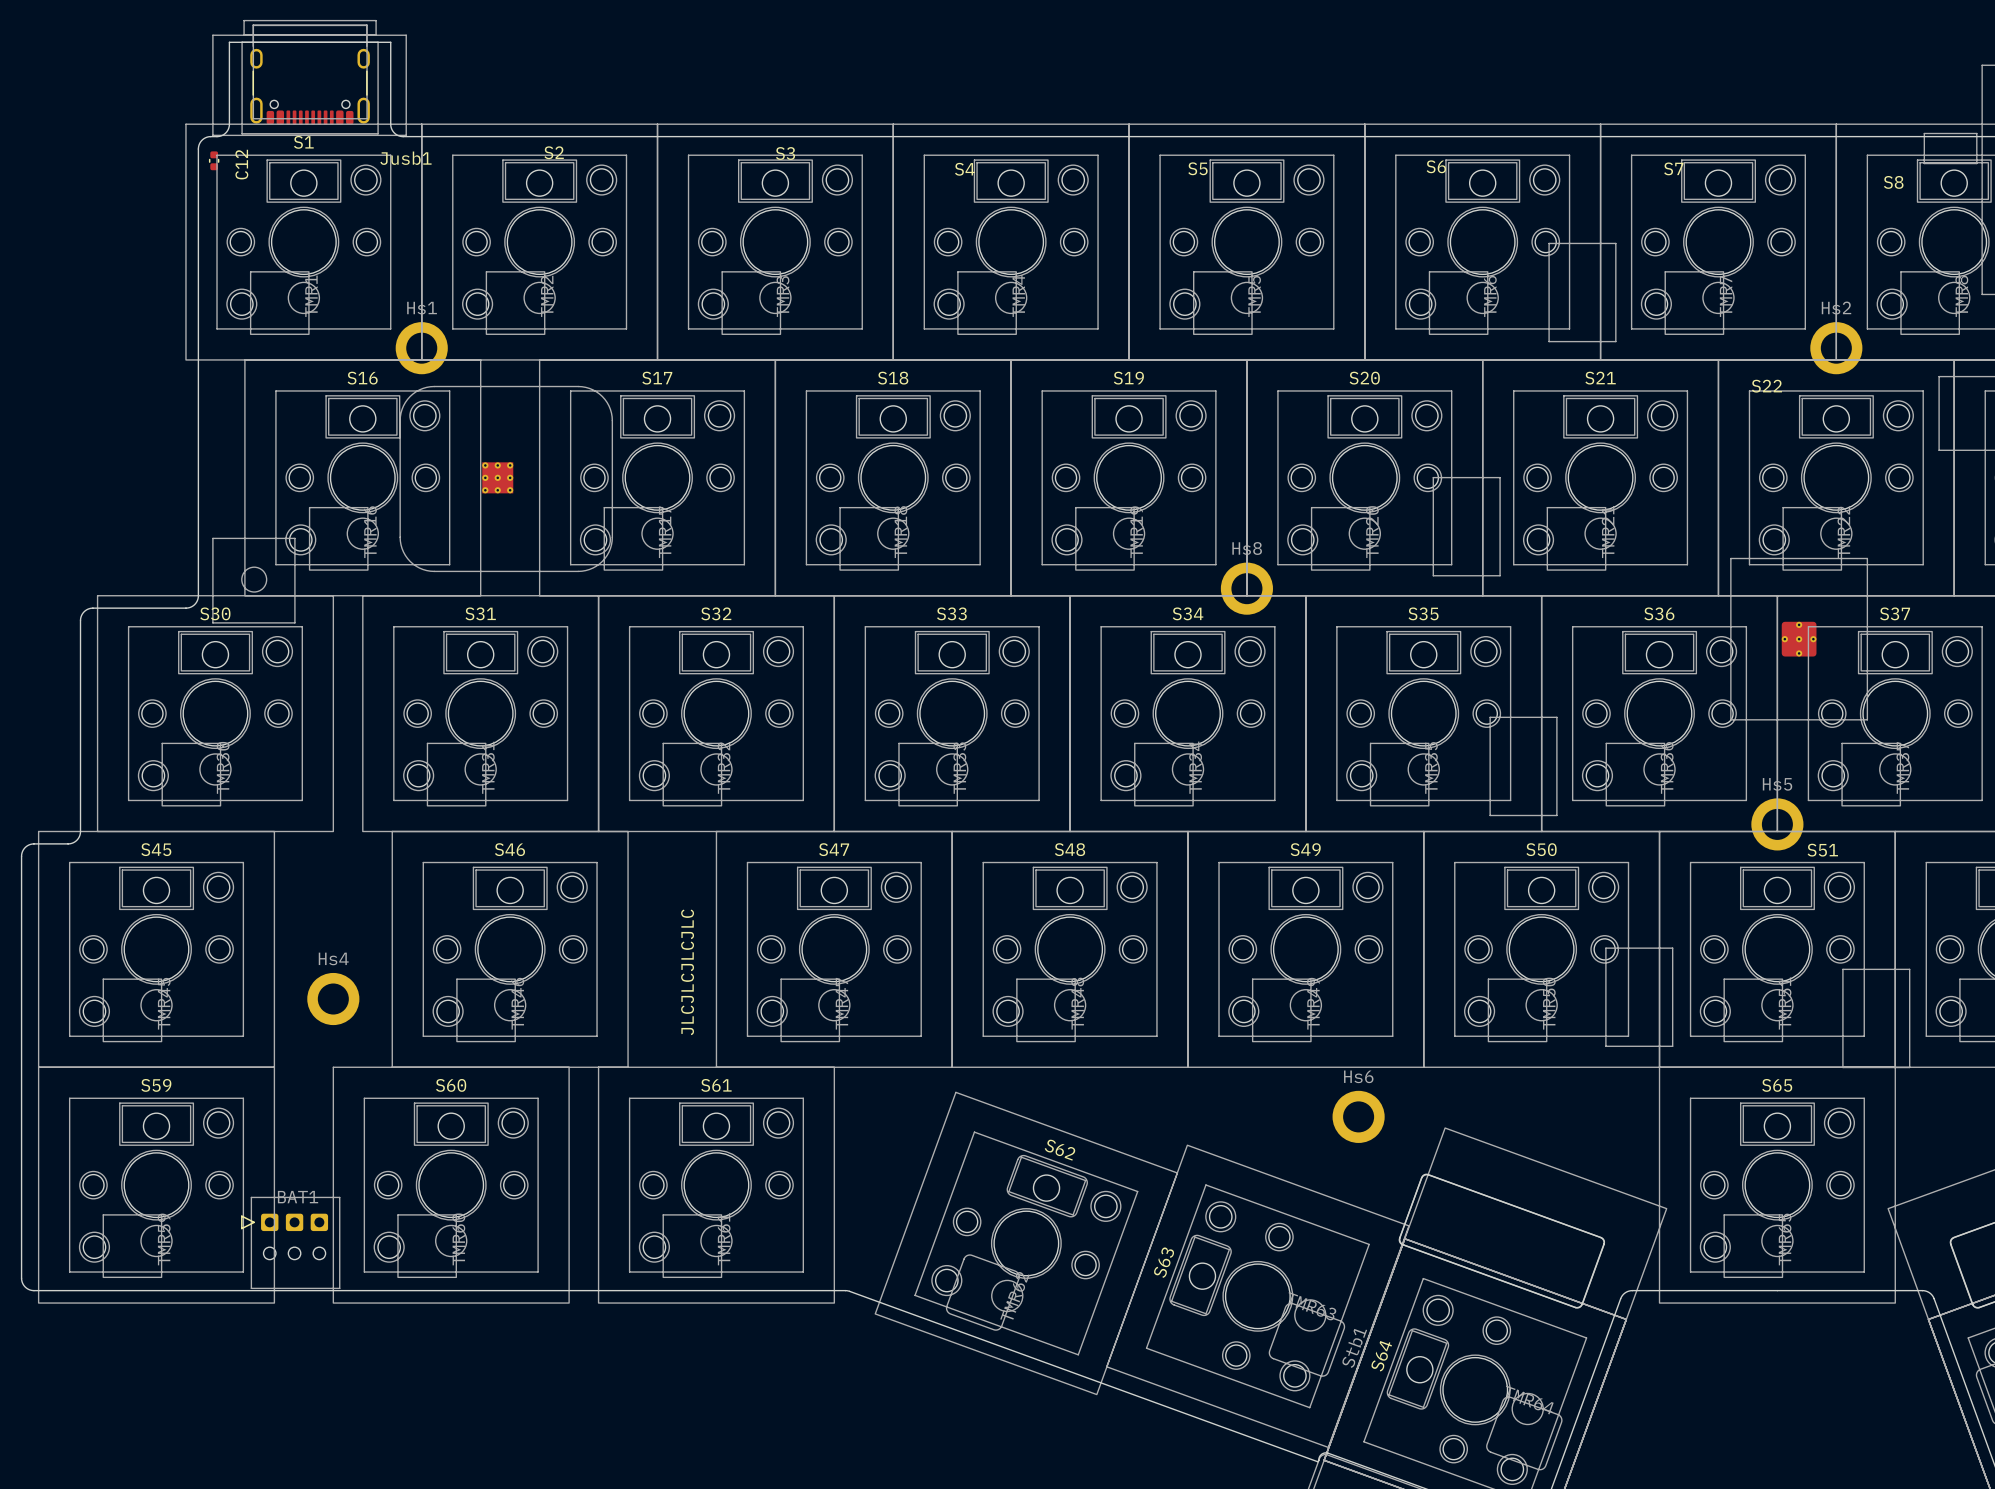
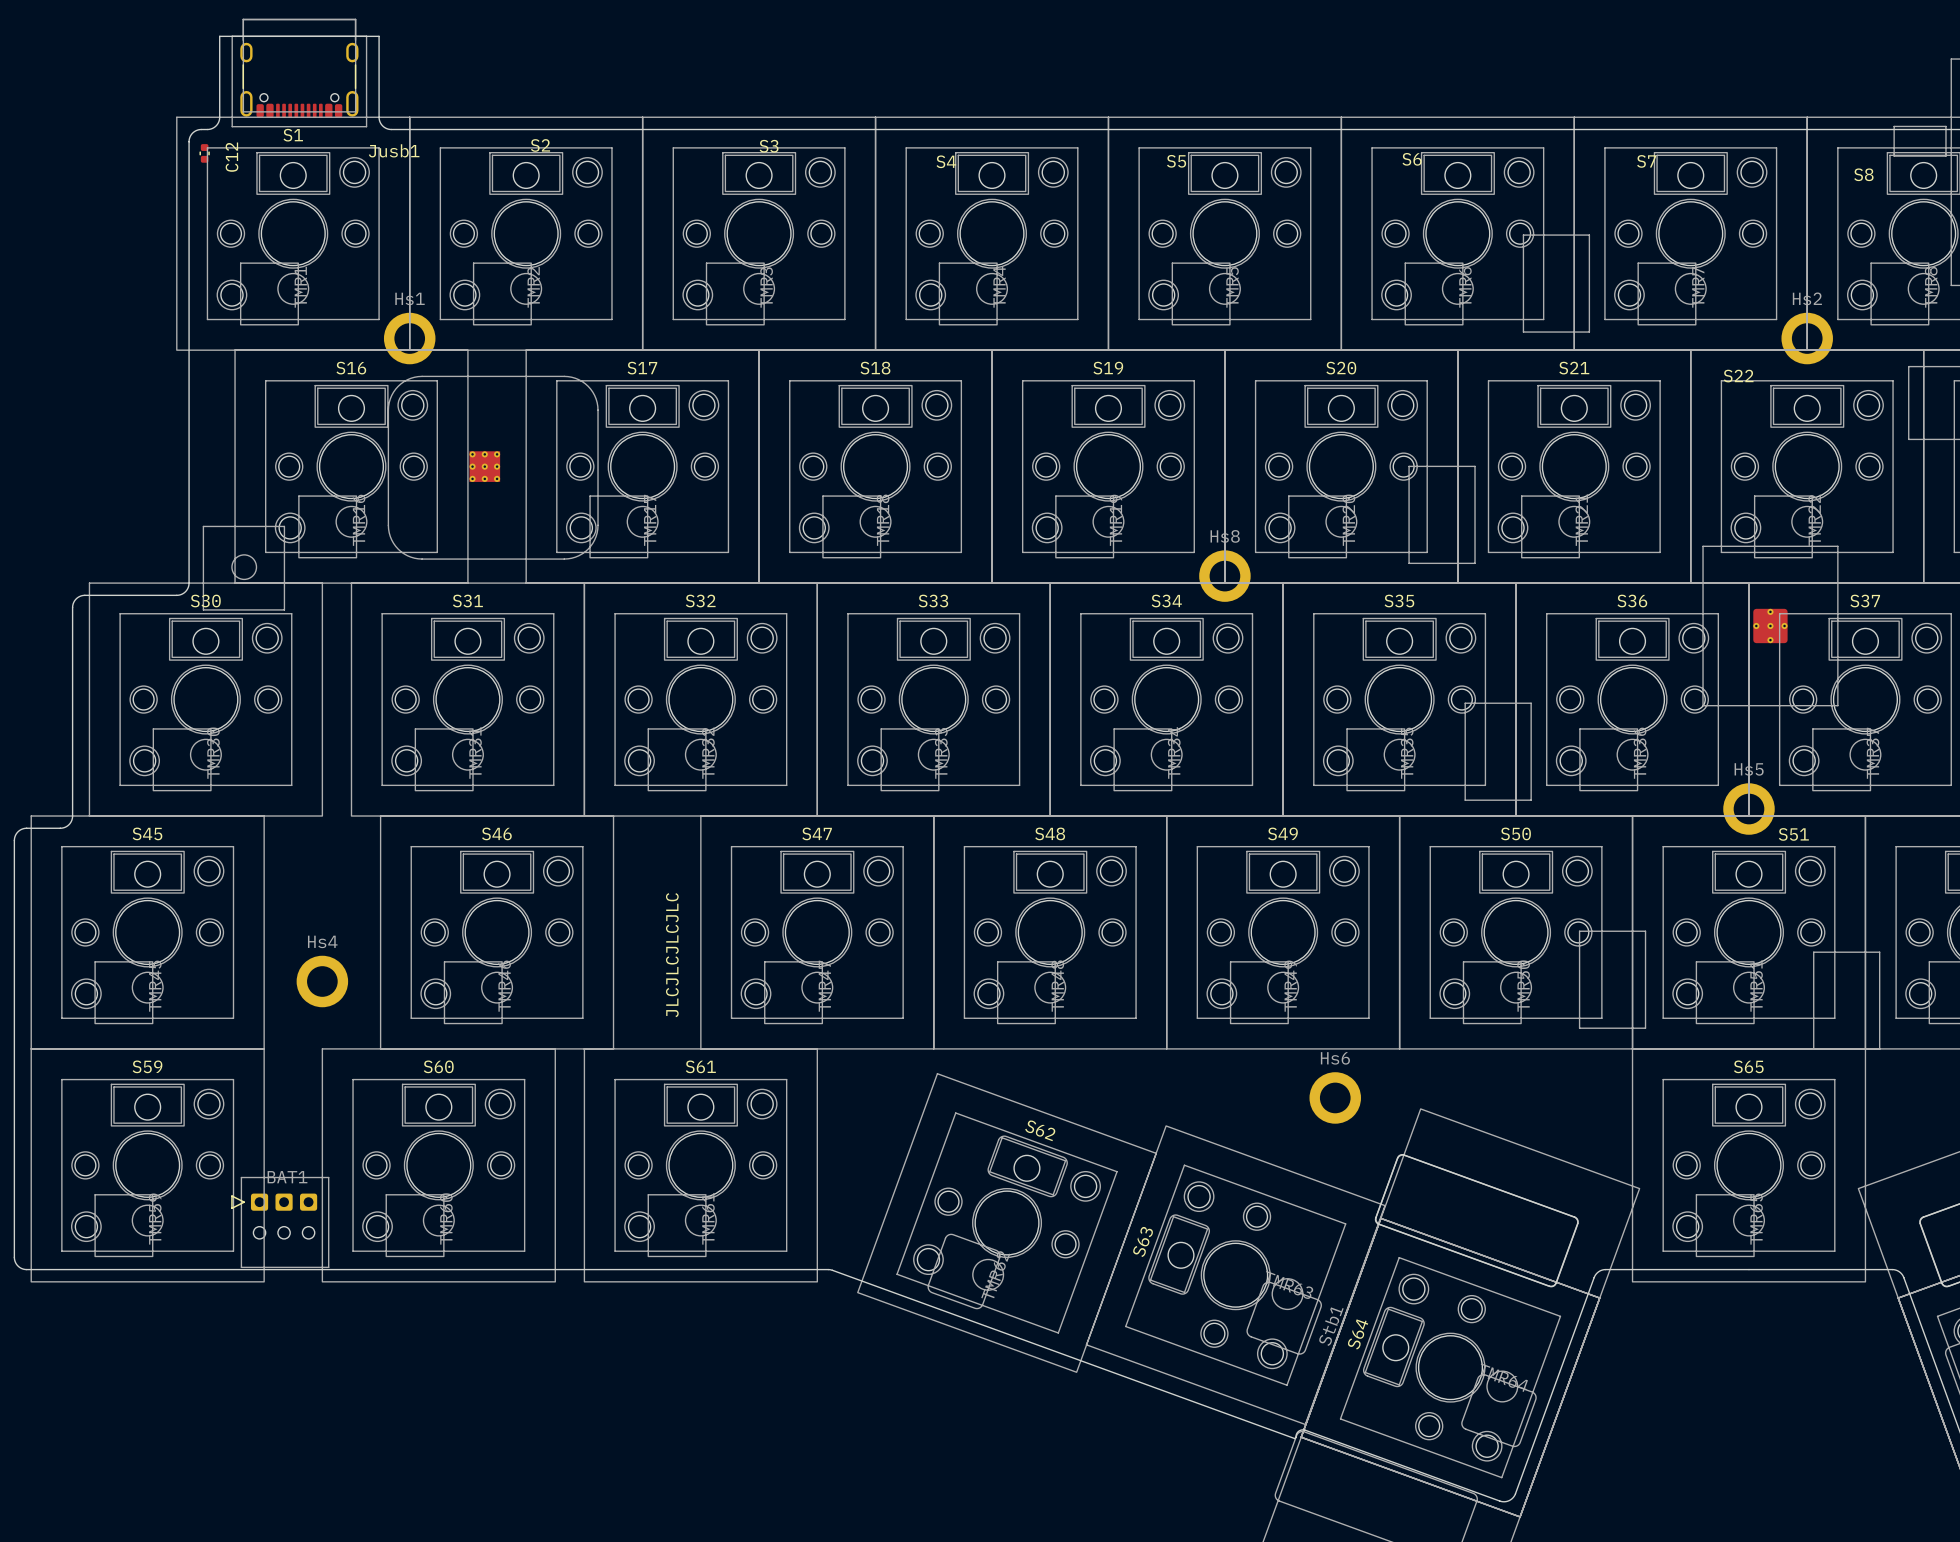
line: (244, 20) (376, 20) (376, 35) (244, 35) (244, 20) -> none
line: (212, 35) (406, 35) (406, 135) (212, 135) (212, 35) -> none

